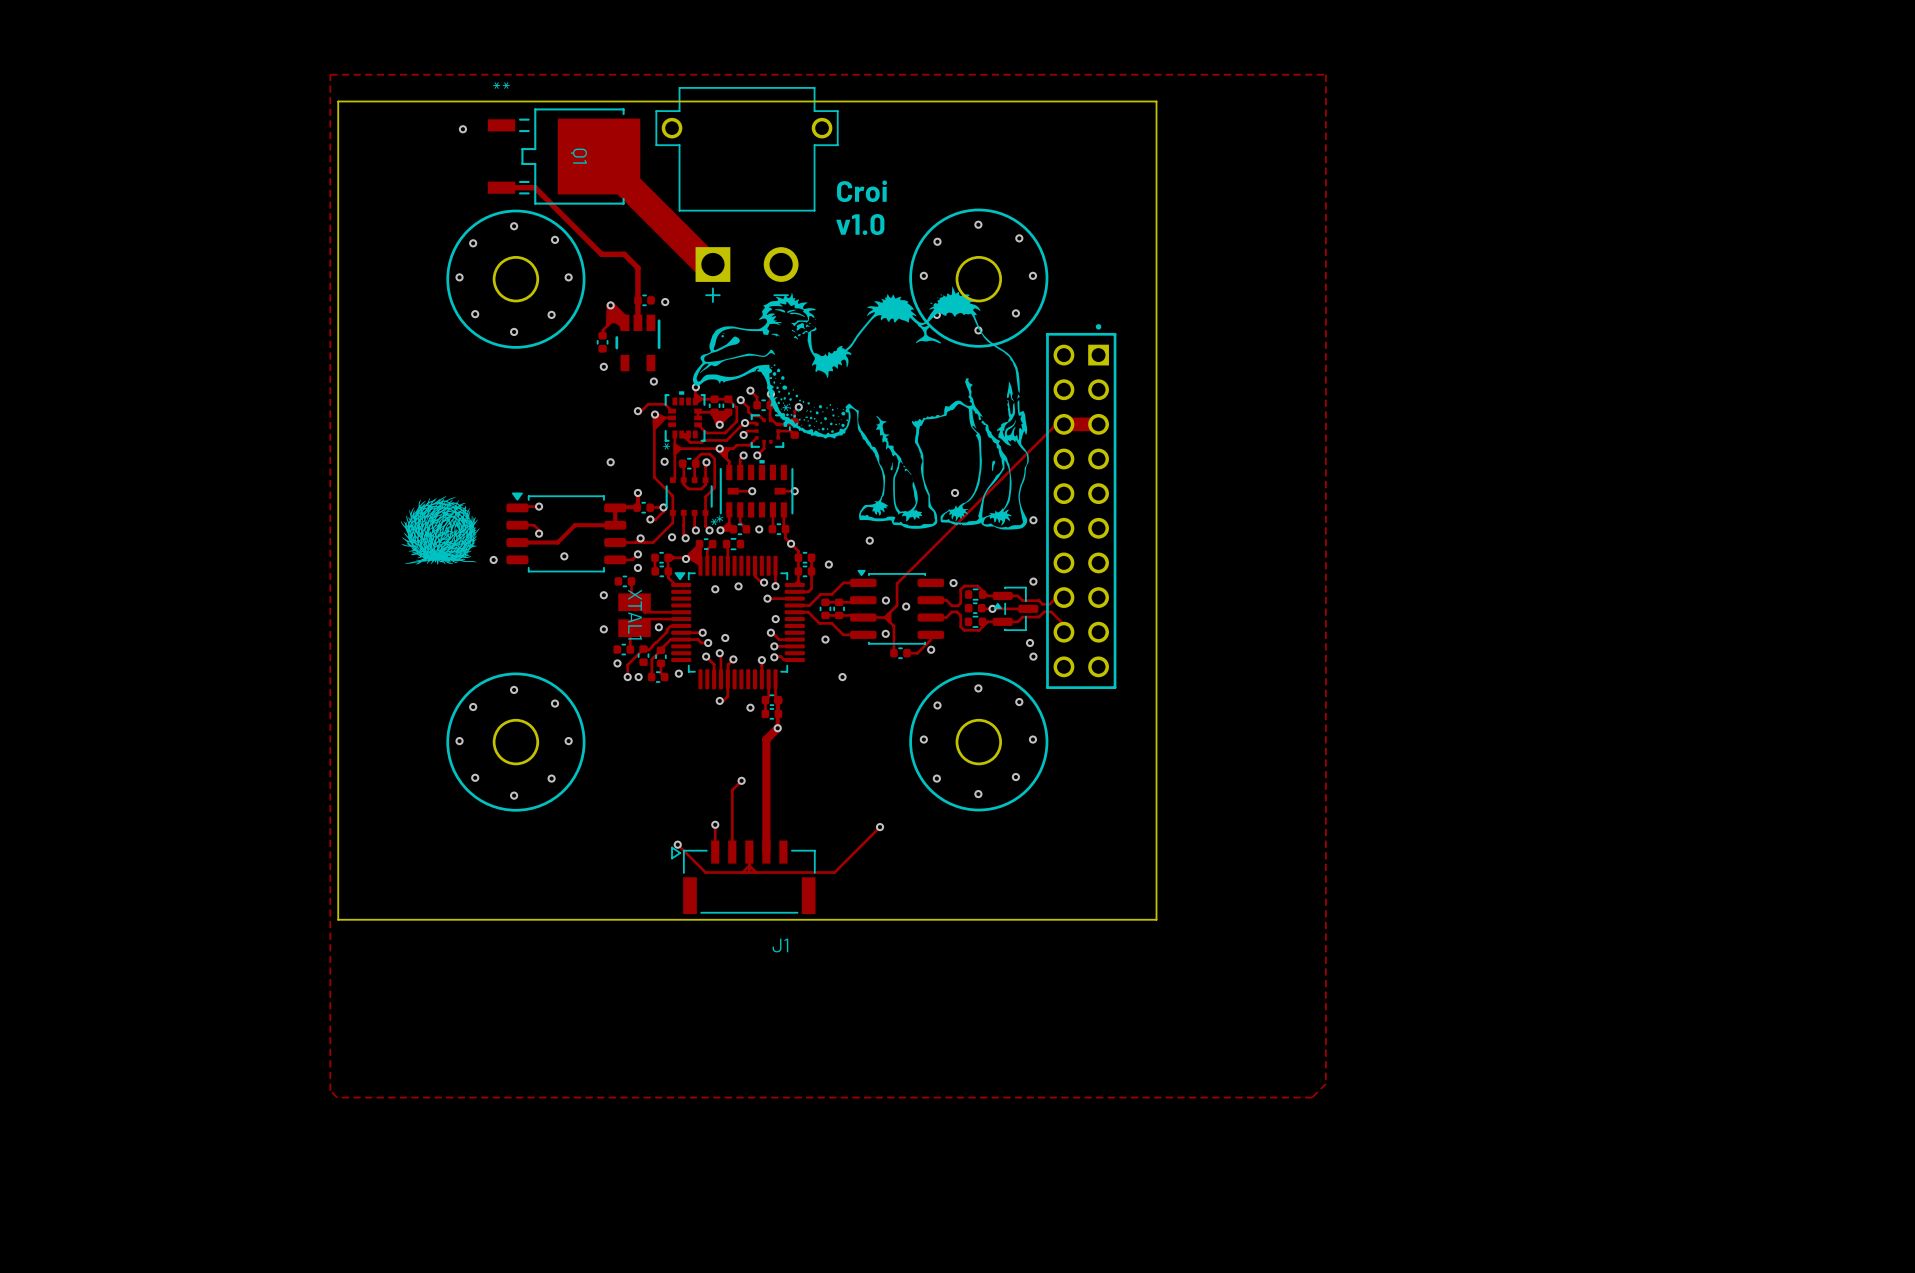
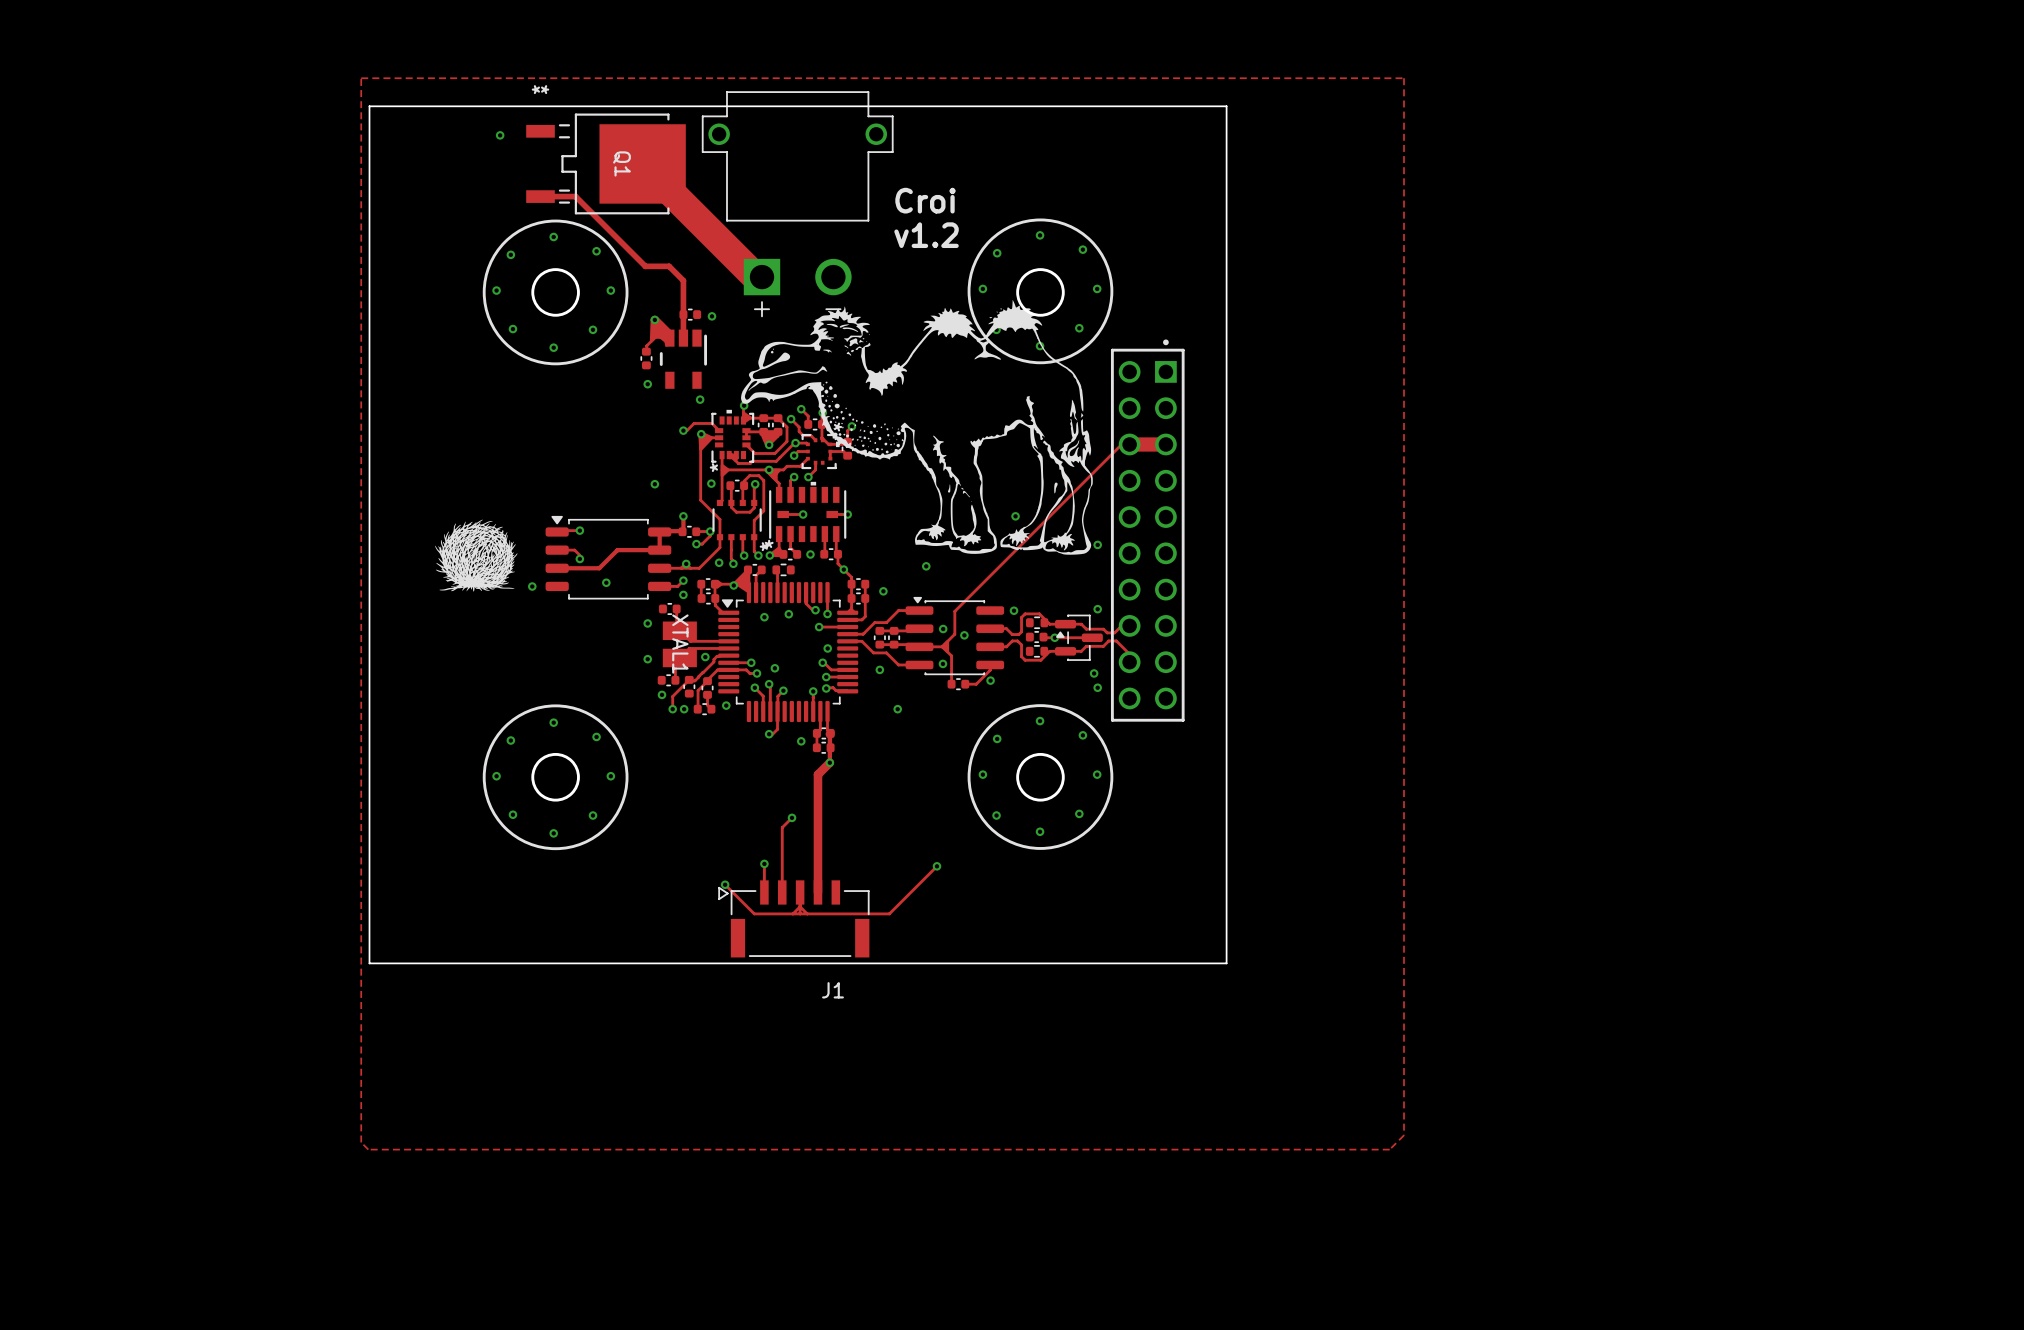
text: v1.0 (860, 224) -> v1.2 (926, 235)

